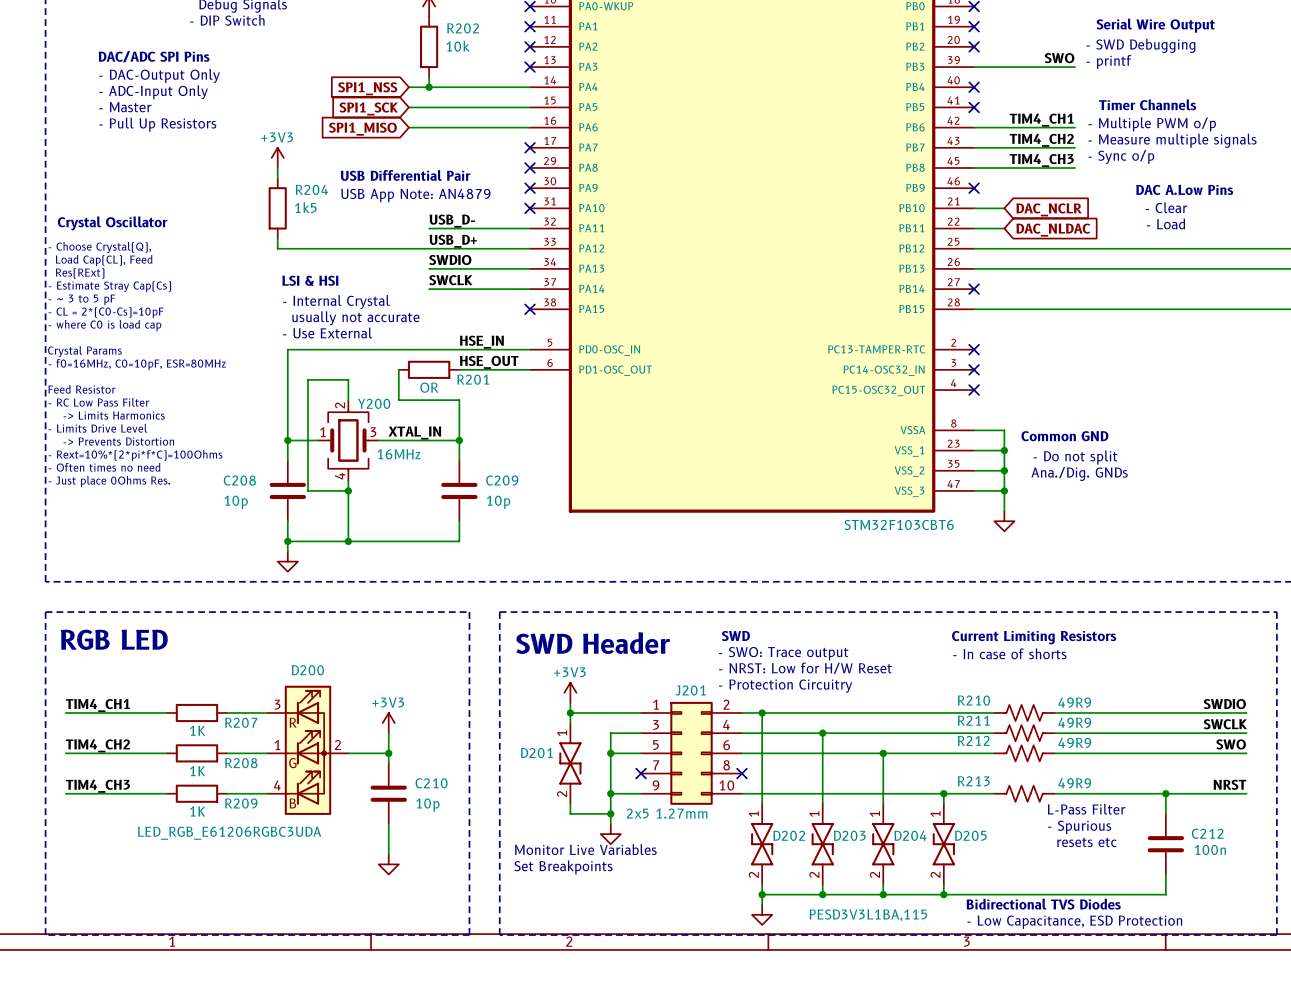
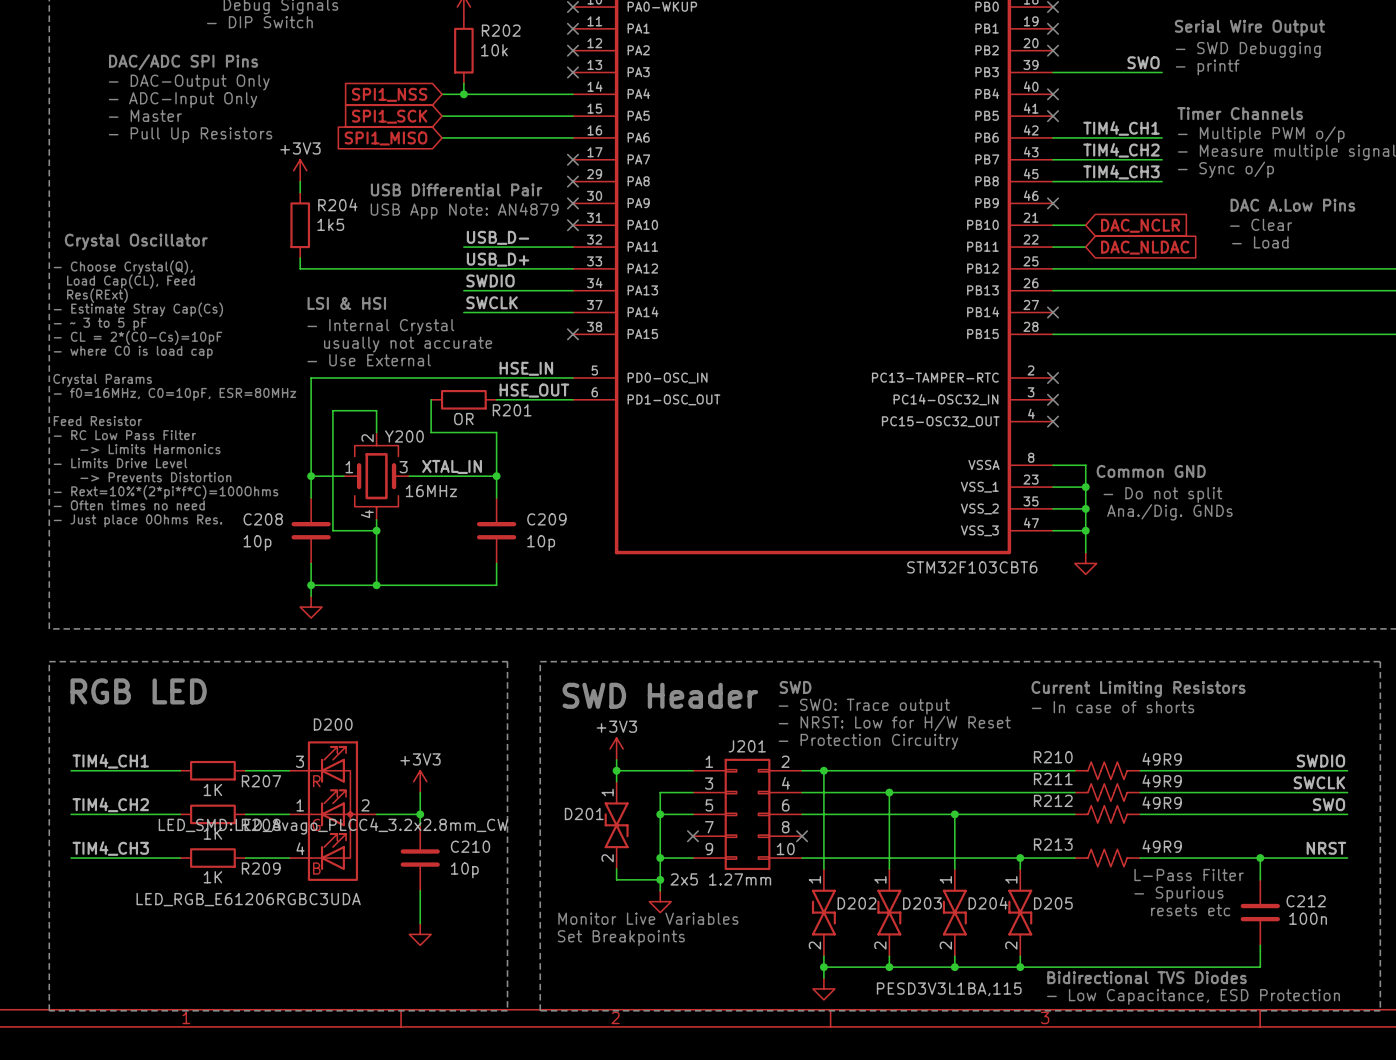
D200 text: none -> LED_SMD:LED_Avago_PLCC4_3.2x2.8mm_CW (333, 826)

